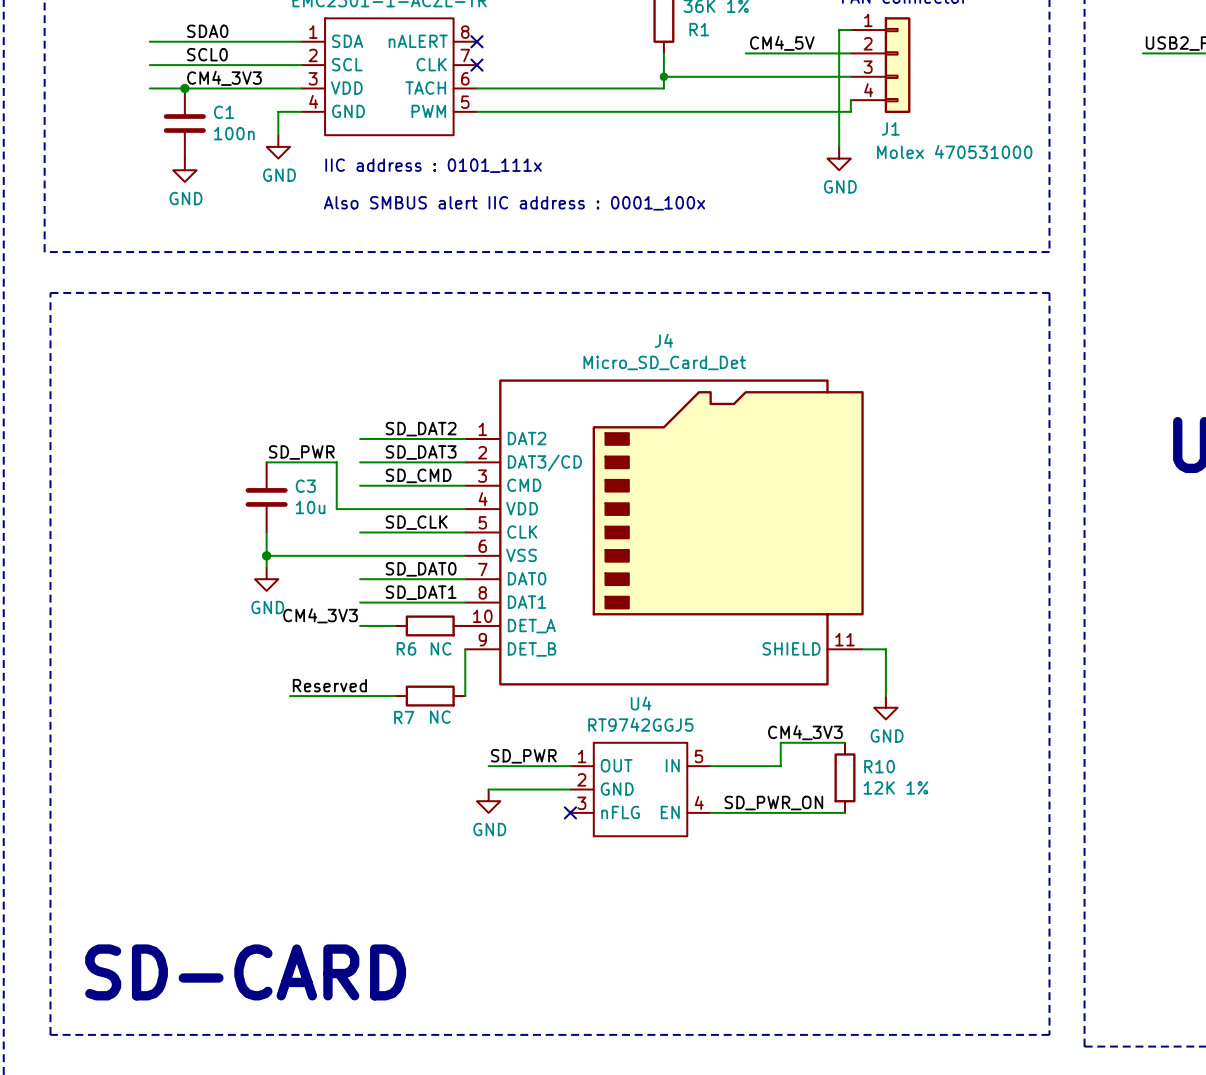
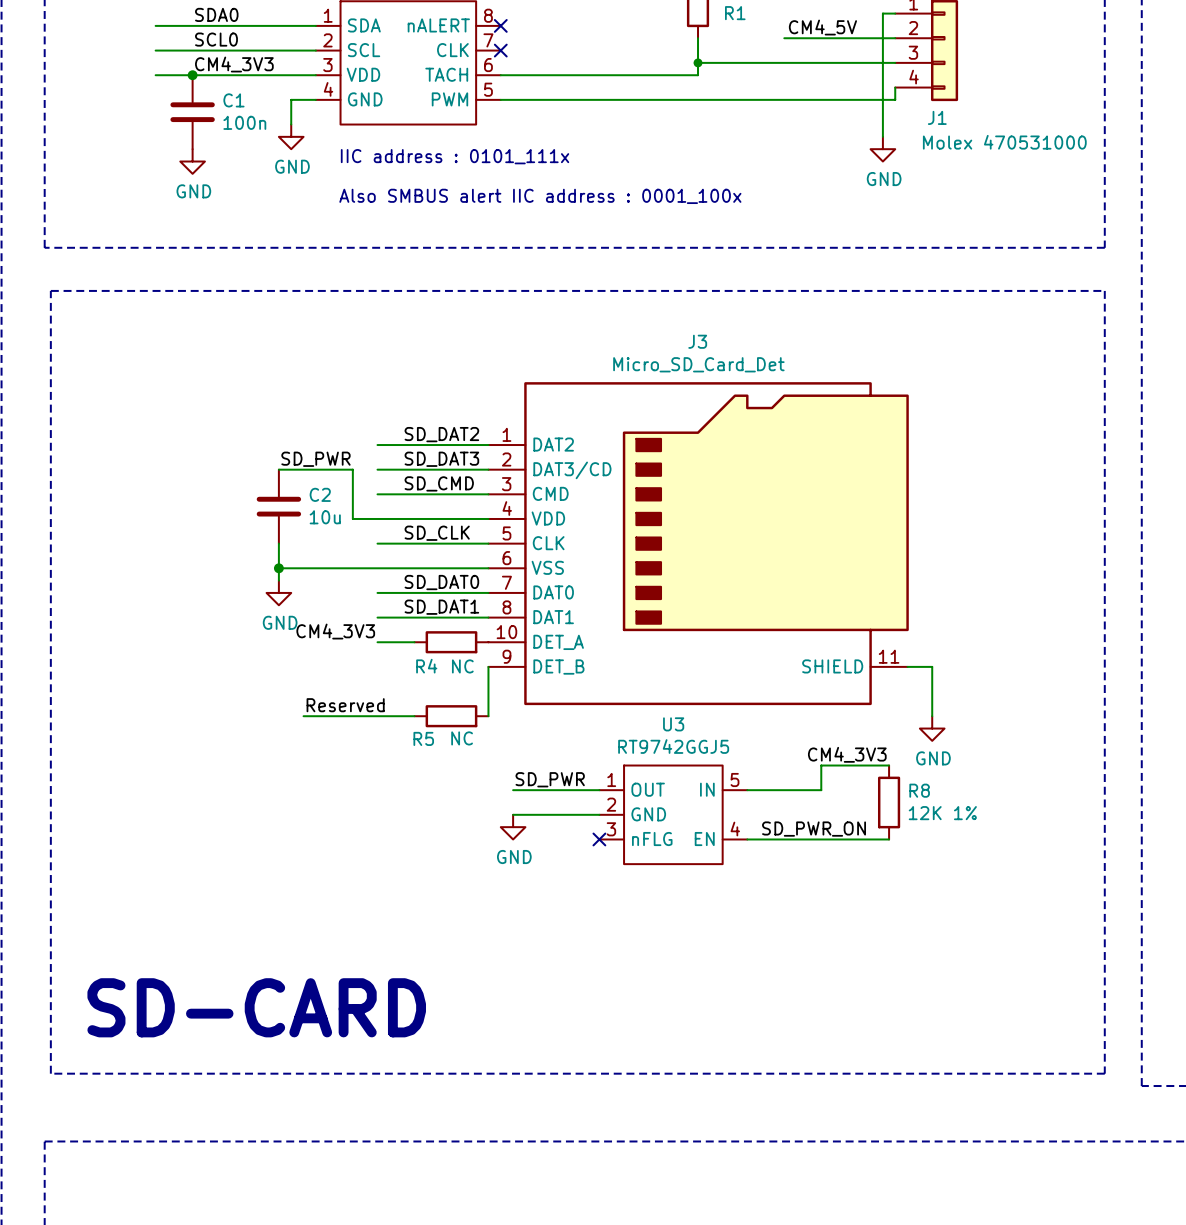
J4 name: J4 (663, 340) -> J3 (697, 341)
C3 name: C3 (305, 486) -> C2 (320, 494)
R6 name: R6 (406, 648) -> R4 (426, 666)
U4 name: U4 (641, 703) -> U3 (673, 724)
R7 name: R7 (404, 717) -> R5 (423, 738)
R10 name: R10 (879, 766) -> R8 (919, 790)

